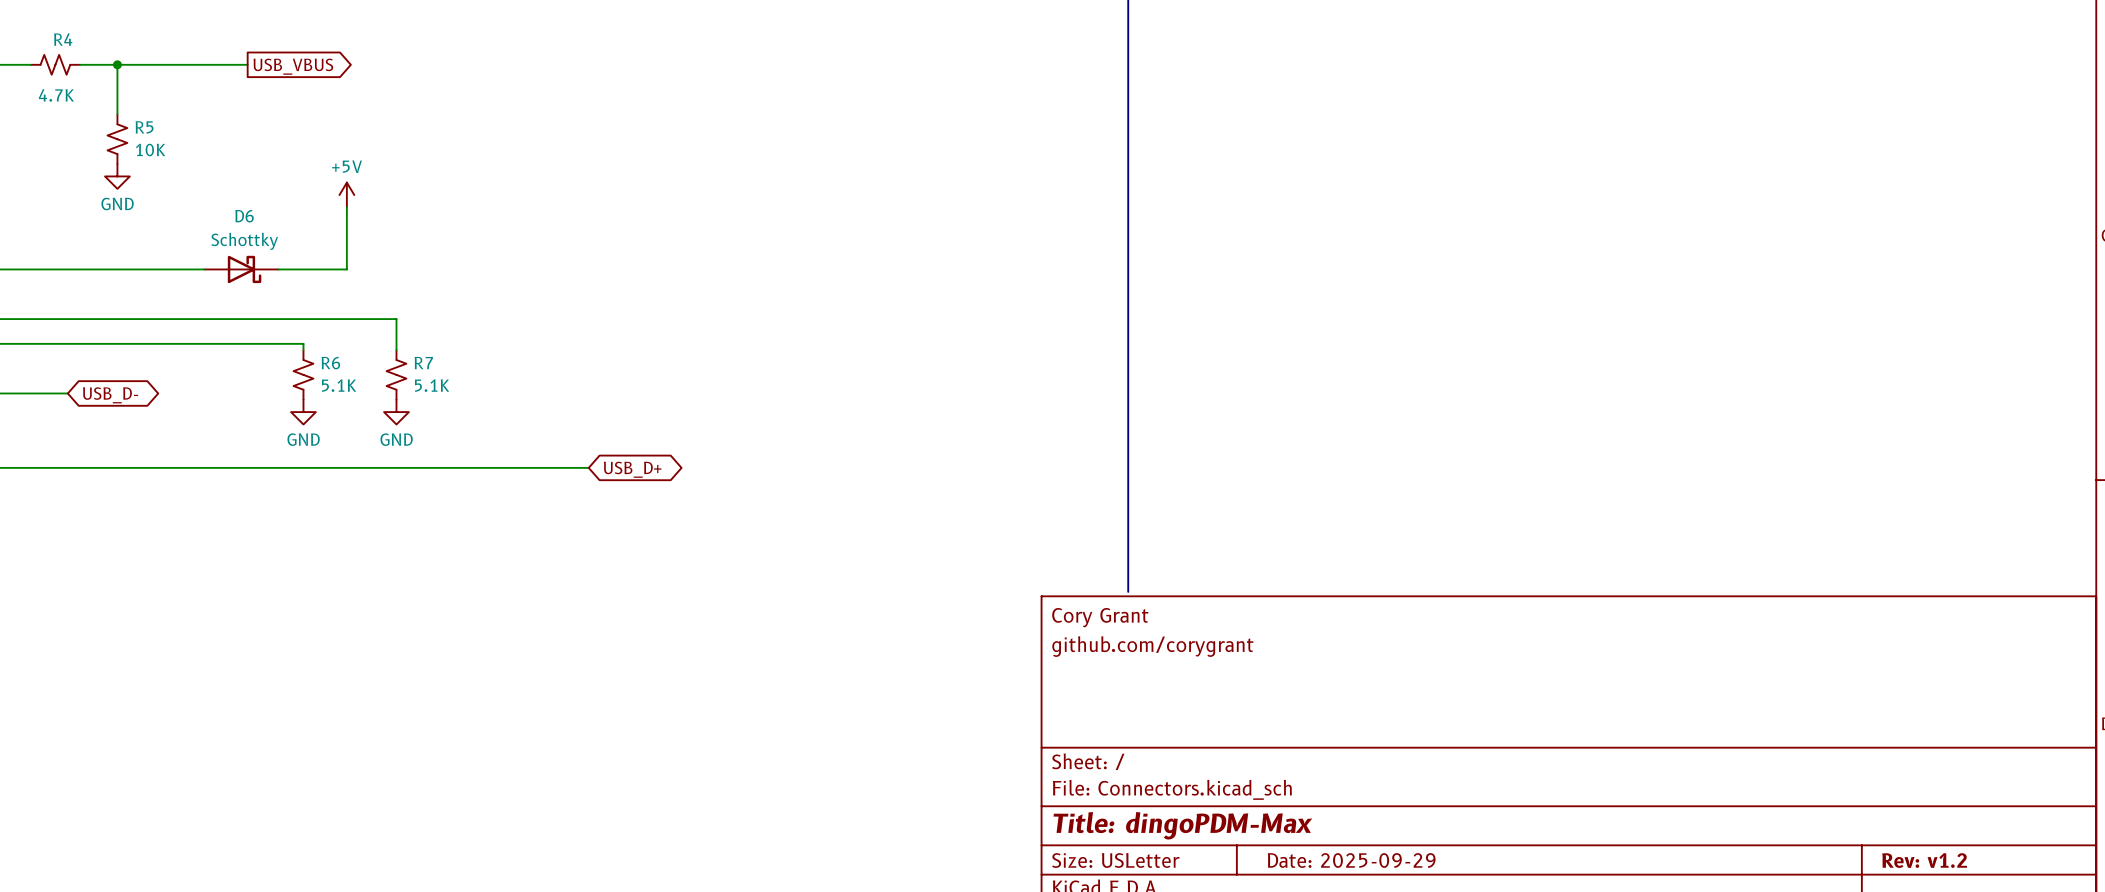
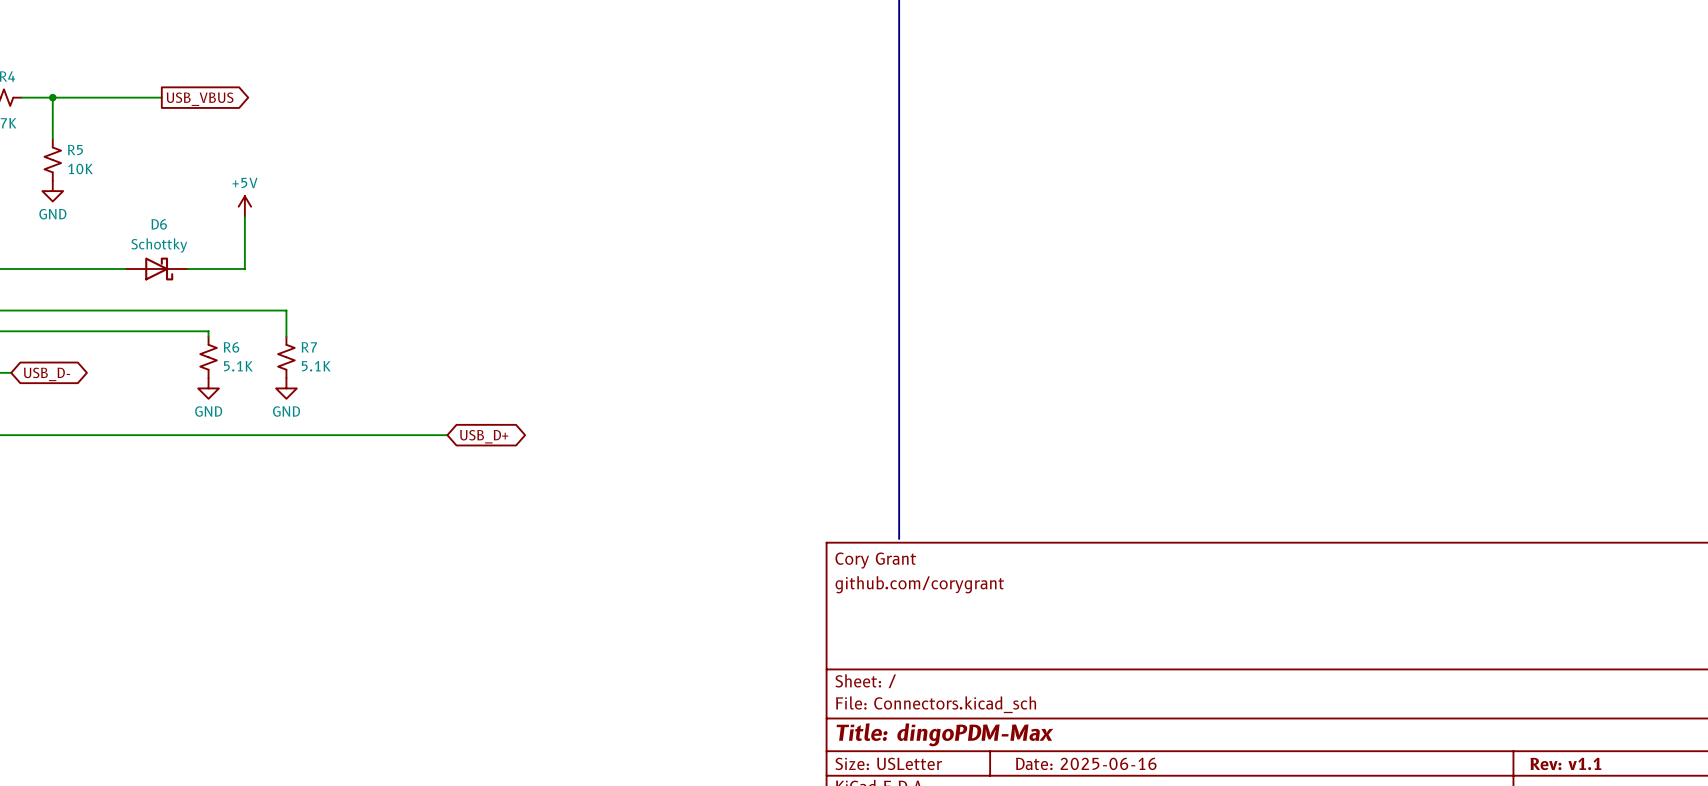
title block: Date: 2025-09-29 (1351, 860) -> Date: 2025-06-16 (1086, 763)
title block: Rev: v1.2 (1924, 860) -> Rev: v1.1 (1565, 763)

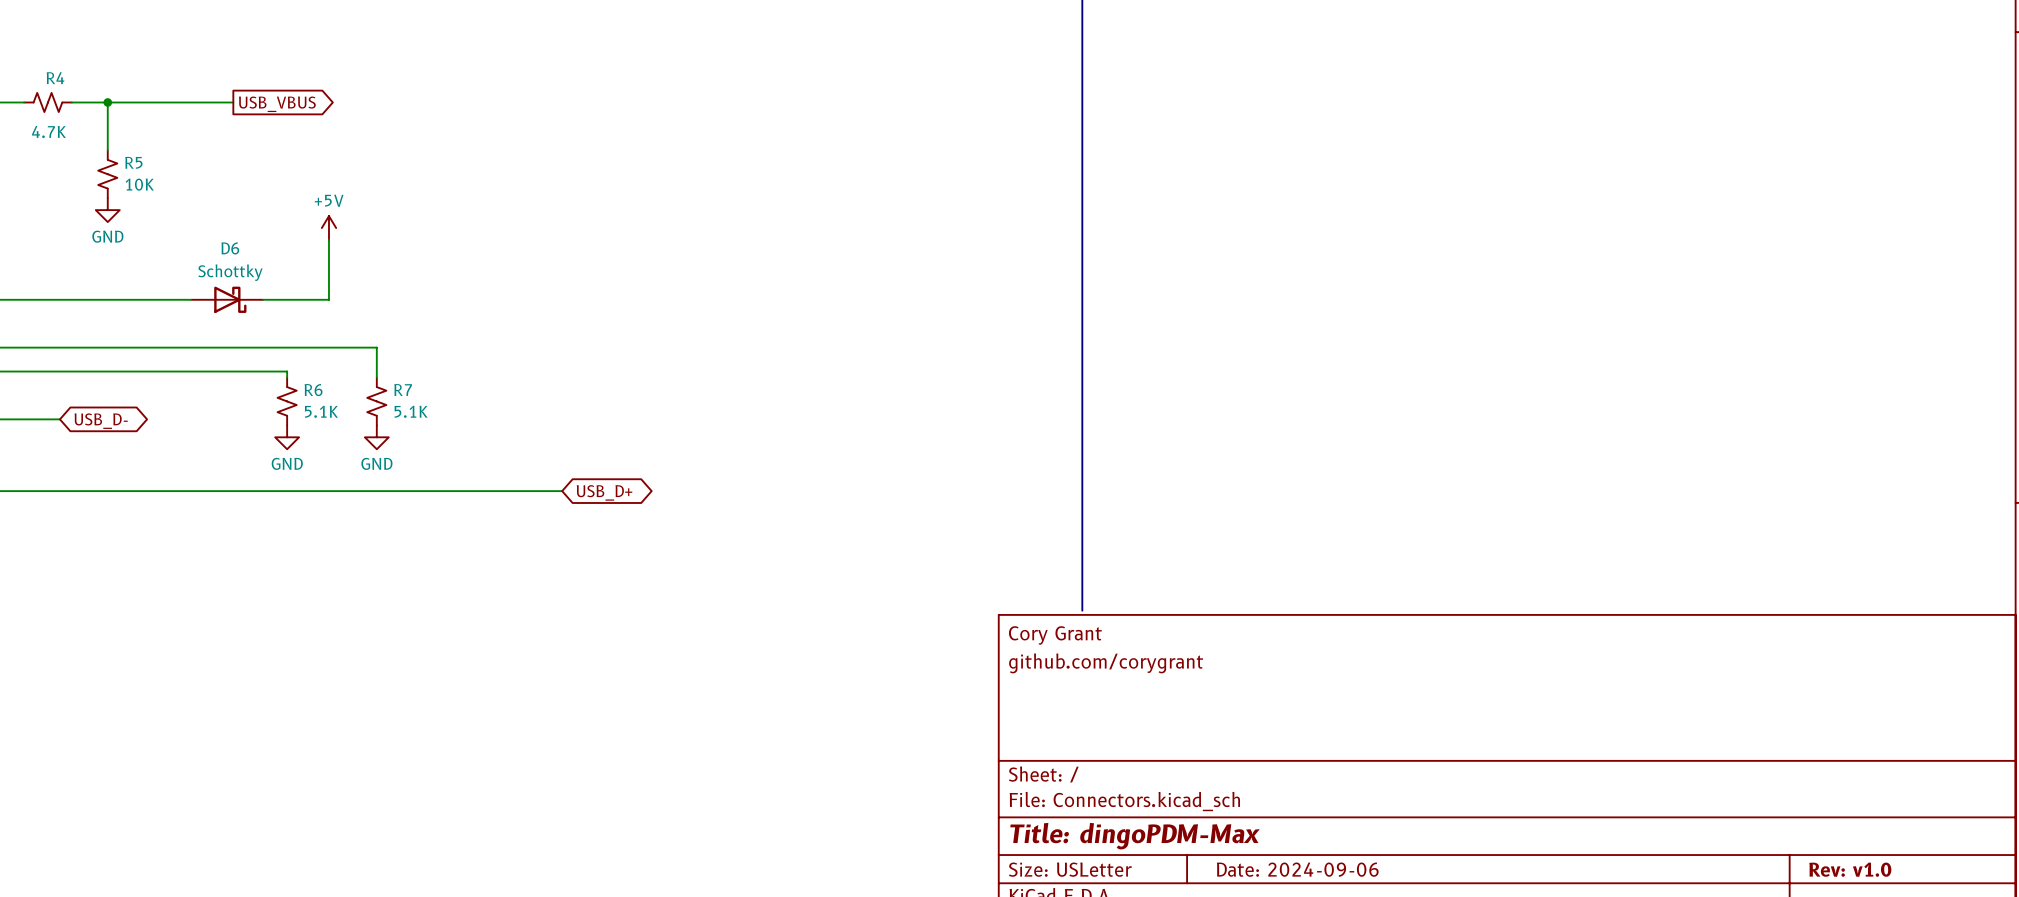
title block: Date: 2025-06-16 (1086, 763) -> Date: 2024-09-06 (1297, 869)
title block: Rev: v1.1 (1565, 763) -> Rev: v1.0 (1850, 869)

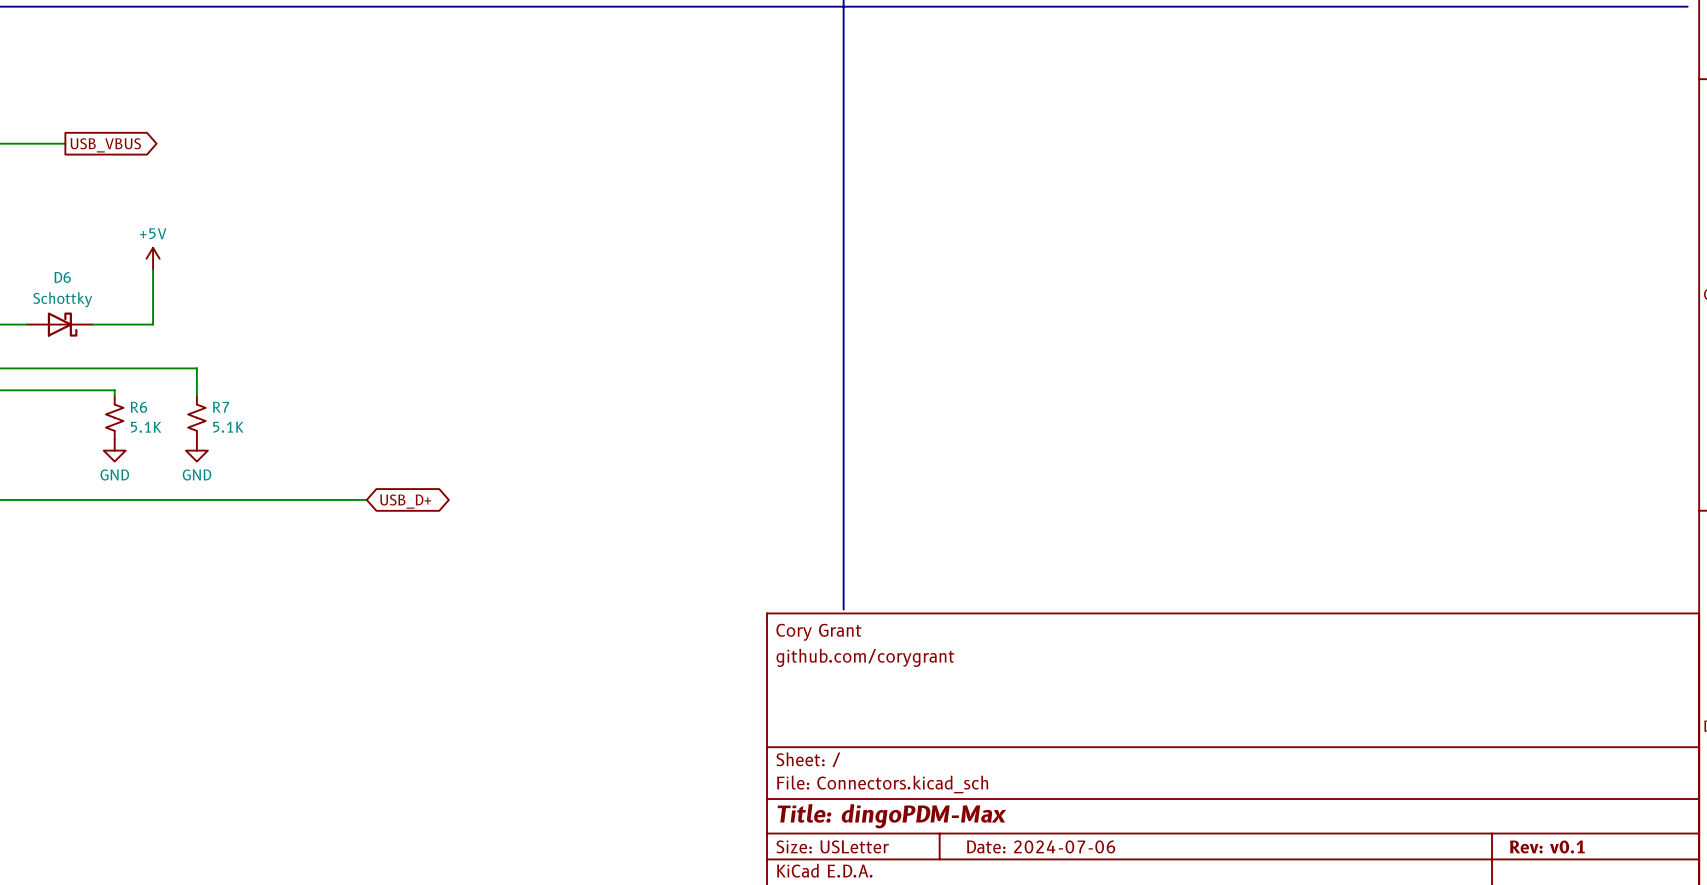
title block: Date: 2024-09-06 (1297, 869) -> Date: 2024-07-06 (1041, 846)
title block: Rev: v1.0 (1850, 869) -> Rev: v0.1 (1547, 846)

